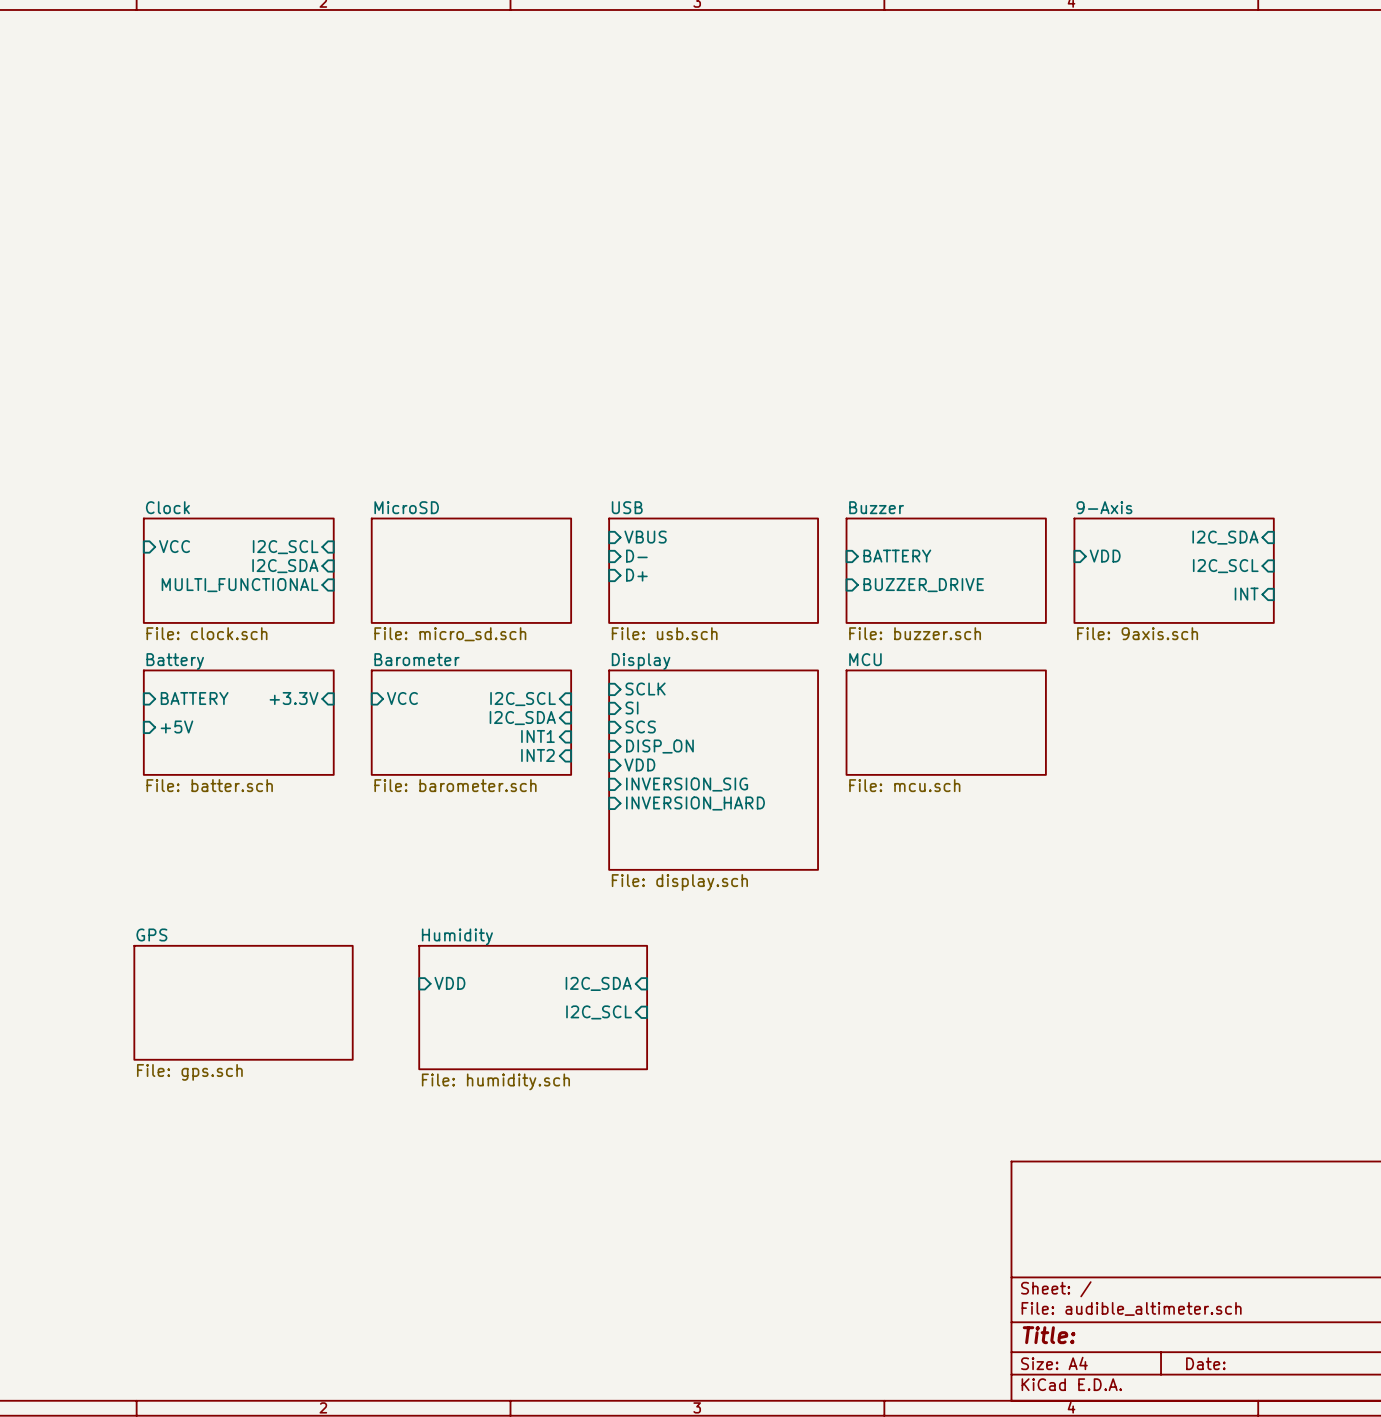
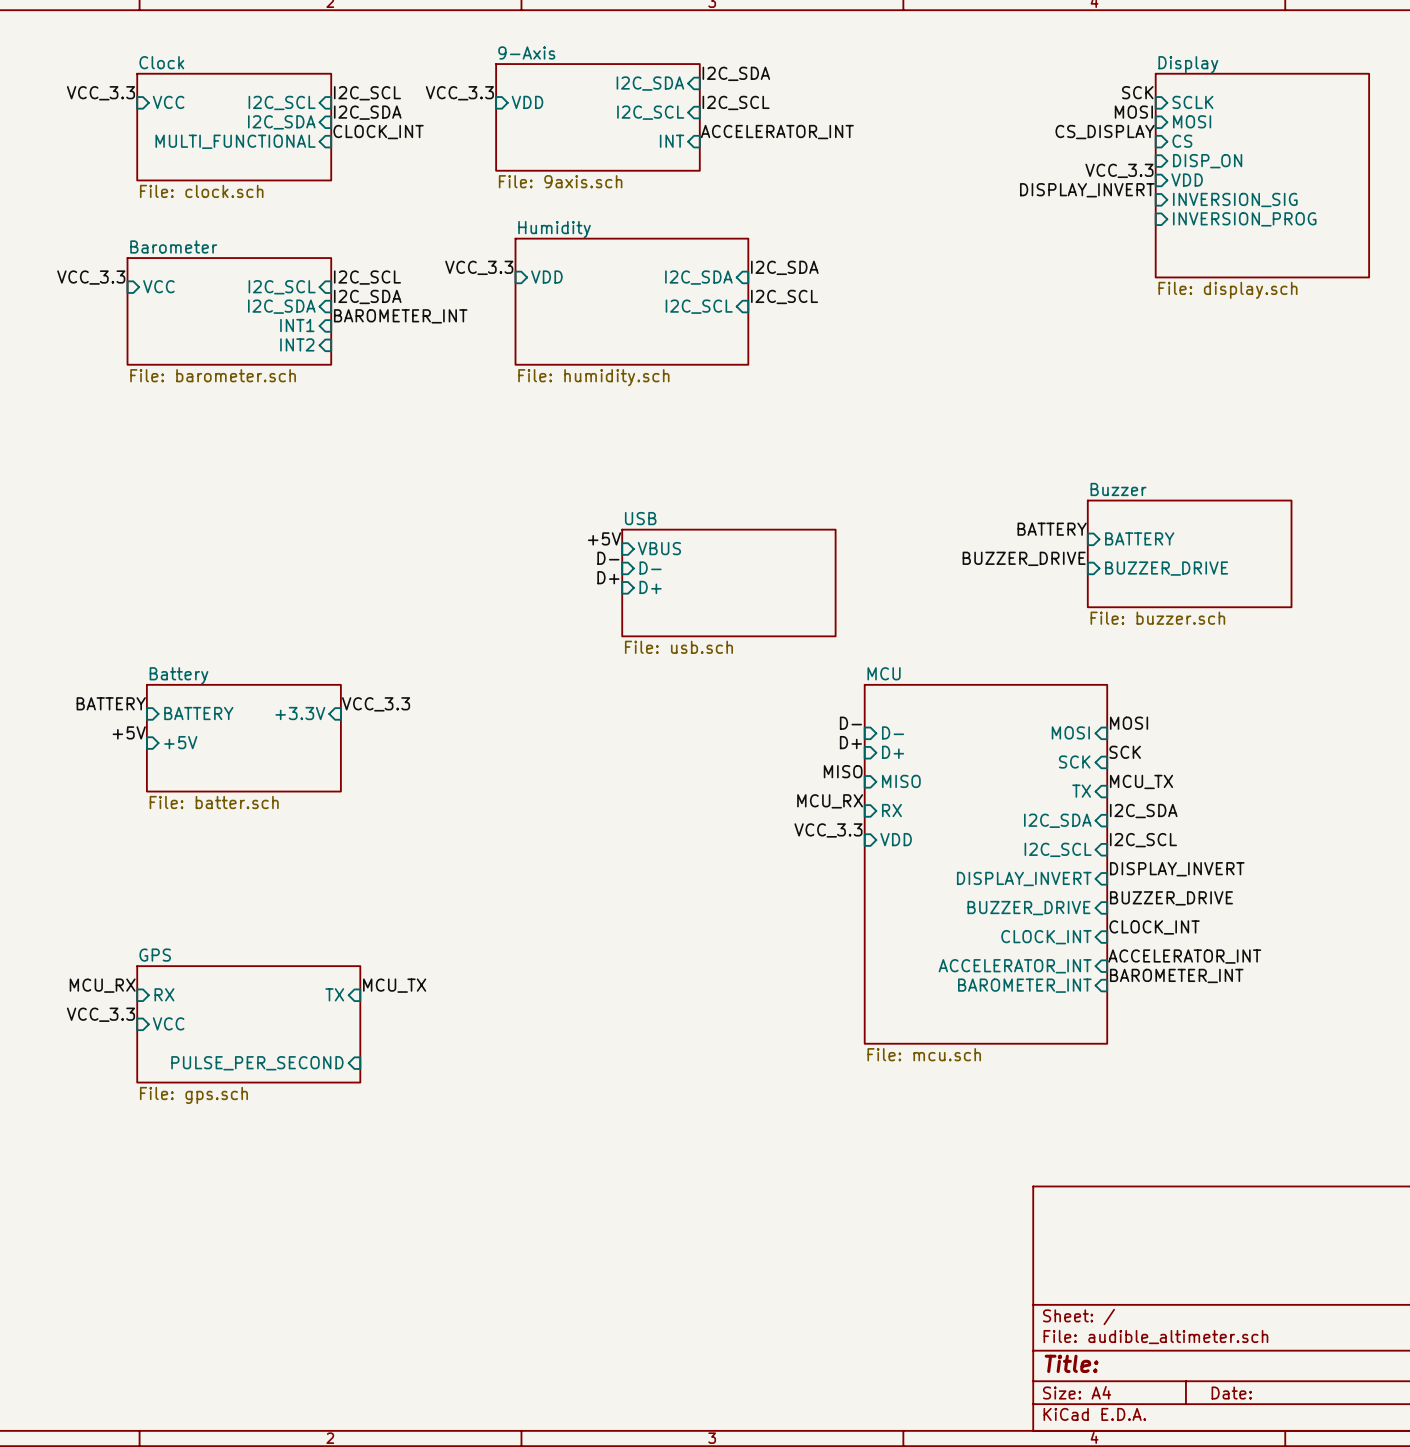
label: none -> I2C_SDA (736, 73)
sheet pin: none -> I2C_SDA (650, 83)
label: none -> SCK (1137, 92)
label: none -> VCC_3.3 (100, 93)
label: none -> I2C_SCL (367, 93)
label: none -> VCC_3.3 (459, 93)
sheet pin: none -> VCC (168, 102)
sheet pin: none -> I2C_SCL (282, 102)
sheet pin: none -> VDD (527, 102)
label: none -> I2C_SCL (736, 102)
sheet pin: none -> SCLK (1192, 102)
label: none -> MOSI (1133, 112)
label: none -> I2C_SDA (367, 112)
sheet pin: none -> I2C_SCL (650, 112)
sheet pin: none -> I2C_SDA (281, 122)
sheet pin: none -> MOSI (1192, 121)
sheet Clock: none -> File: clock.sch (234, 127)
label: none -> CLOCK_INT (378, 132)
label: none -> ACCELERATOR_INT (777, 132)
label: none -> CS_DISPLAY (1105, 132)
sheet pin: none -> MULTI_FUNCTIONAL (235, 141)
sheet pin: none -> INT (672, 141)
sheet pin: none -> CS (1182, 141)
sheet pin: none -> DISP_ON (1207, 161)
label: none -> VCC_3.3 (1119, 170)
sheet Display: none -> File: display.sch (1262, 175)
sheet pin: none -> VDD (1187, 180)
label: none -> DISPLAY_INVERT (1087, 190)
sheet pin: none -> INVERSION_SIG (1235, 199)
sheet pin: none -> INVERSION_PROG (1244, 219)
label: none -> VCC_3.3 (479, 267)
label: none -> I2C_SDA (784, 267)
label: none -> VCC_3.3 (91, 277)
label: none -> I2C_SCL (367, 277)
sheet pin: none -> VDD (546, 277)
sheet pin: none -> I2C_SDA (698, 277)
sheet pin: none -> VCC (158, 286)
sheet pin: none -> I2C_SCL (282, 287)
label: none -> I2C_SDA (367, 296)
label: none -> I2C_SCL (784, 296)
sheet Humidity: none -> File: humidity.sch (631, 301)
sheet pin: none -> I2C_SDA (281, 306)
sheet pin: none -> I2C_SCL (699, 306)
sheet Barometer: none -> File: barometer.sch (229, 311)
label: none -> BAROMETER_INT (400, 316)
sheet pin: none -> INT1 (297, 325)
sheet pin: none -> INT2 (297, 344)
label: none -> BATTERY (1052, 529)
label: none -> +5V (604, 538)
sheet pin: none -> BATTERY (1139, 538)
sheet pin: I2C_SDA (1225, 537) -> none
sheet Buzzer: none -> File: buzzer.sch (1189, 553)
sheet pin: VCC (174, 546) -> none
label: none -> D- (608, 558)
sheet pin: I2C_SCL (285, 547) -> none
label: none -> BUZZER_DRIVE (1024, 558)
sheet pin: BATTERY (897, 556) -> none
sheet pin: VDD (1105, 556) -> none
sheet pin: none -> BUZZER_DRIVE (1166, 568)
label: none -> D+ (608, 577)
sheet pin: I2C_SDA (285, 566) -> none
sheet pin: I2C_SCL (1225, 566) -> none
sheet Clock: File: clock.sch (238, 570) -> none
sheet MicroSD: File: micro_sd.sch (471, 570) -> none
sheet Buzzer: File: buzzer.sch (946, 570) -> none
sheet 9-Axis position: (1174, 570) -> (597, 117)
sheet pin: MULTI_FUNCTIONAL (240, 585) -> none
sheet pin: BUZZER_DRIVE (923, 585) -> none
sheet pin: INT (1246, 594) -> none
label: none -> BATTERY (111, 703)
label: none -> VCC_3.3 (376, 704)
sheet pin: SCLK (645, 689) -> none
sheet pin: VCC (402, 698) -> none
sheet pin: I2C_SCL (523, 699) -> none
label: none -> D- (850, 723)
label: none -> MOSI (1129, 723)
sheet pin: SI (631, 708) -> none
label: none -> +5V (129, 732)
sheet pin: none -> D- (893, 732)
sheet pin: none -> MOSI (1070, 732)
sheet pin: I2C_SDA (522, 718) -> none
sheet Barometer: File: barometer.sch (471, 722) -> none
sheet MCU: File: mcu.sch (946, 722) -> none
sheet pin: SCS (640, 726) -> none
label: none -> D+ (850, 742)
sheet pin: INT1 (537, 736) -> none
sheet pin: none -> D+ (893, 752)
label: none -> SCK (1125, 752)
sheet pin: none -> SCK (1074, 762)
sheet pin: DISP_ON (659, 746) -> none
sheet pin: INT2 (537, 755) -> none
label: none -> MISO (843, 771)
sheet pin: VDD (639, 764) -> none
sheet pin: none -> MISO (901, 781)
label: none -> MCU_TX (1141, 781)
sheet Display: File: display.sch (713, 770) -> none
sheet pin: none -> TX (1081, 791)
sheet pin: INVERSION_SIG (687, 784) -> none
label: none -> MCU_RX (830, 801)
sheet pin: none -> RX (891, 810)
label: none -> I2C_SDA (1143, 811)
sheet pin: INVERSION_HARD (695, 803) -> none
sheet pin: none -> I2C_SDA (1057, 820)
label: none -> VCC_3.3 (828, 830)
sheet pin: none -> VDD (896, 839)
label: none -> I2C_SCL (1143, 840)
sheet pin: none -> I2C_SCL (1058, 849)
sheet MCU: none -> File: mcu.sch (985, 864)
label: none -> DISPLAY_INVERT (1177, 869)
sheet pin: none -> DISPLAY_INVERT (1024, 878)
label: none -> BUZZER_DRIVE (1171, 898)
sheet pin: none -> BUZZER_DRIVE (1028, 908)
label: none -> CLOCK_INT (1154, 927)
sheet pin: none -> CLOCK_INT (1046, 937)
label: none -> ACCELERATOR_INT (1184, 956)
sheet pin: none -> ACCELERATOR_INT (1015, 966)
label: none -> BAROMETER_INT (1176, 975)
label: none -> MCU_RX (102, 985)
label: none -> MCU_TX (394, 985)
sheet pin: none -> BAROMETER_INT (1024, 985)
sheet pin: none -> RX (164, 994)
sheet pin: none -> TX (334, 994)
sheet pin: VDD (449, 983) -> none
sheet pin: I2C_SDA (598, 983) -> none
label: none -> VCC_3.3 (100, 1014)
sheet pin: none -> VCC (168, 1023)
sheet Humidity: File: humidity.sch (533, 1007) -> none
sheet pin: I2C_SCL (599, 1012) -> none
sheet pin: none -> PULSE_PER_SECOND (257, 1063)

